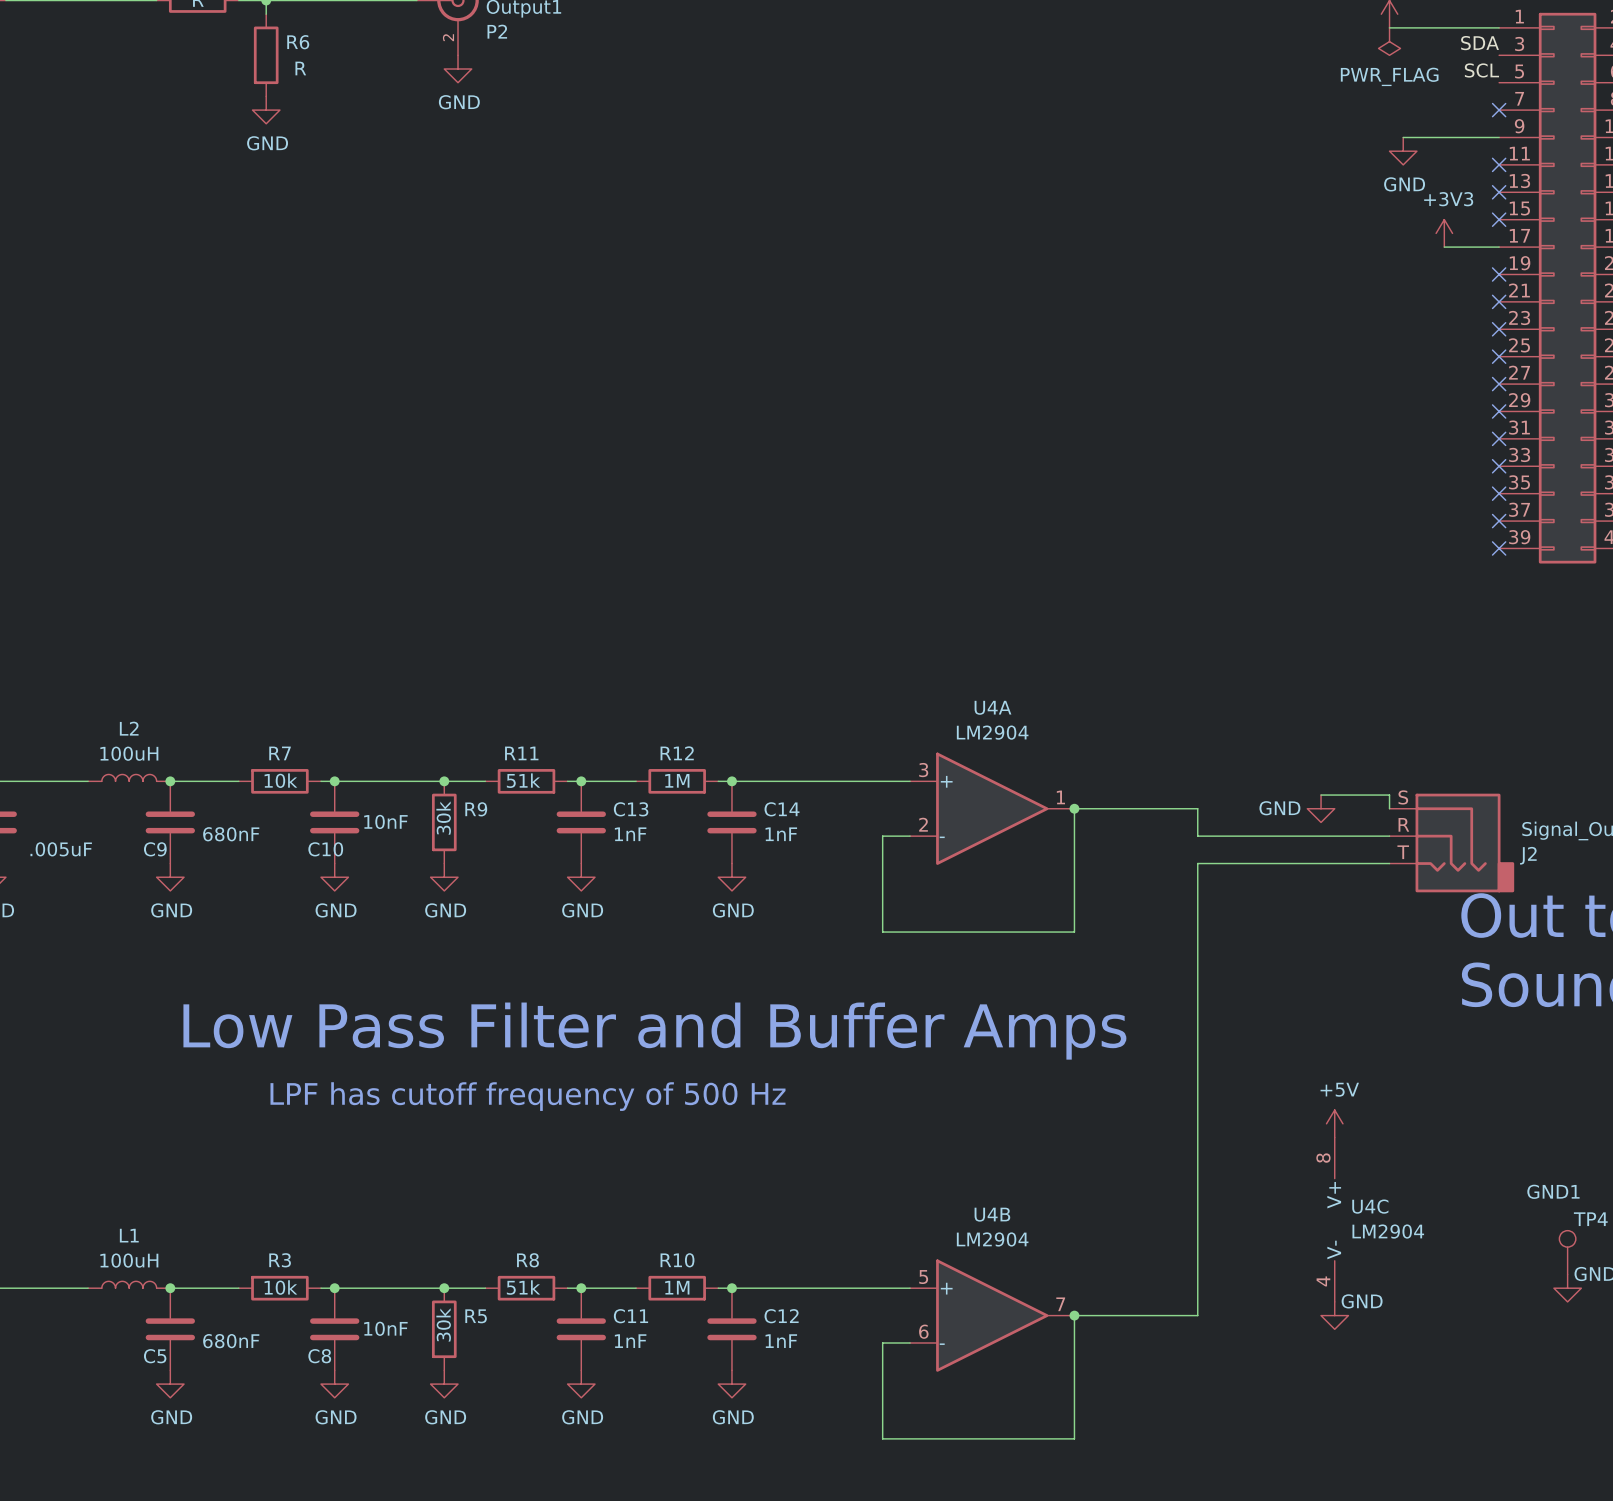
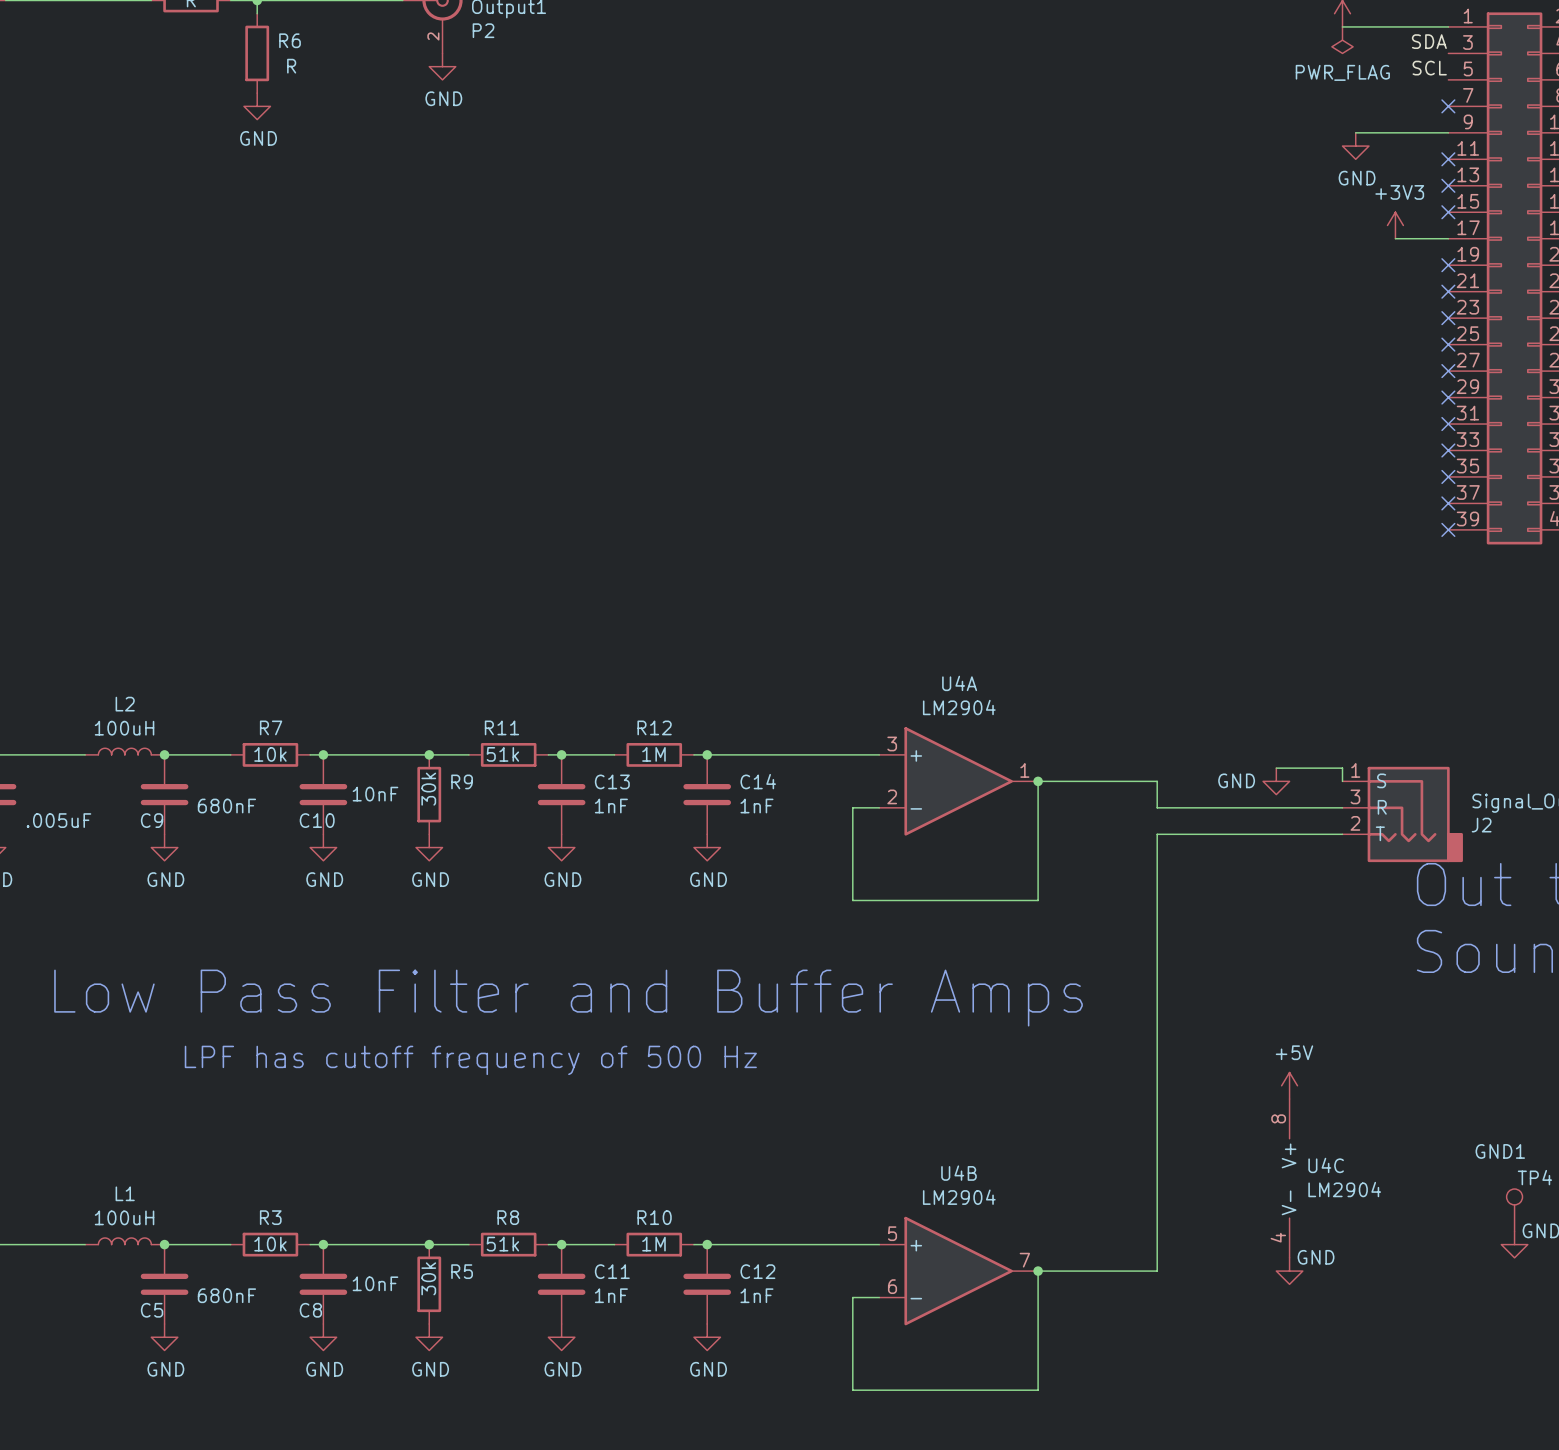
J2 pin number: S (1403, 797) -> 1 (1355, 770)
J2 pin name: none -> S (1381, 780)
J2 pin number: R (1403, 824) -> 3 (1355, 796)
J2 pin name: none -> R (1382, 807)
J2 pin number: T (1403, 852) -> 2 (1355, 823)
J2 pin name: none -> T (1380, 833)

